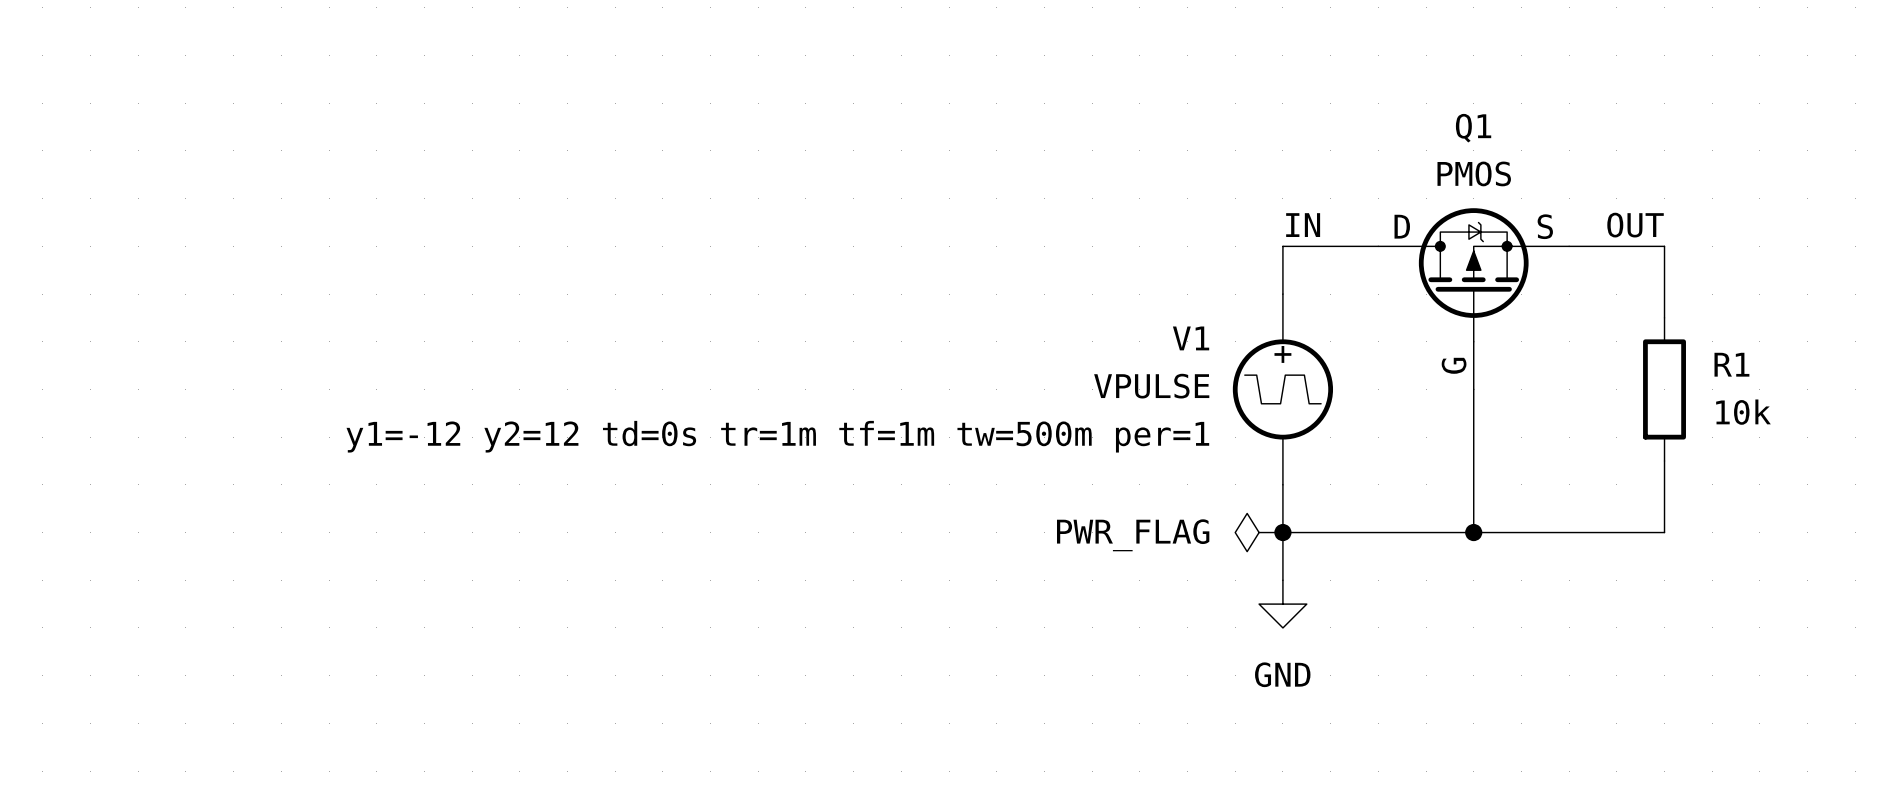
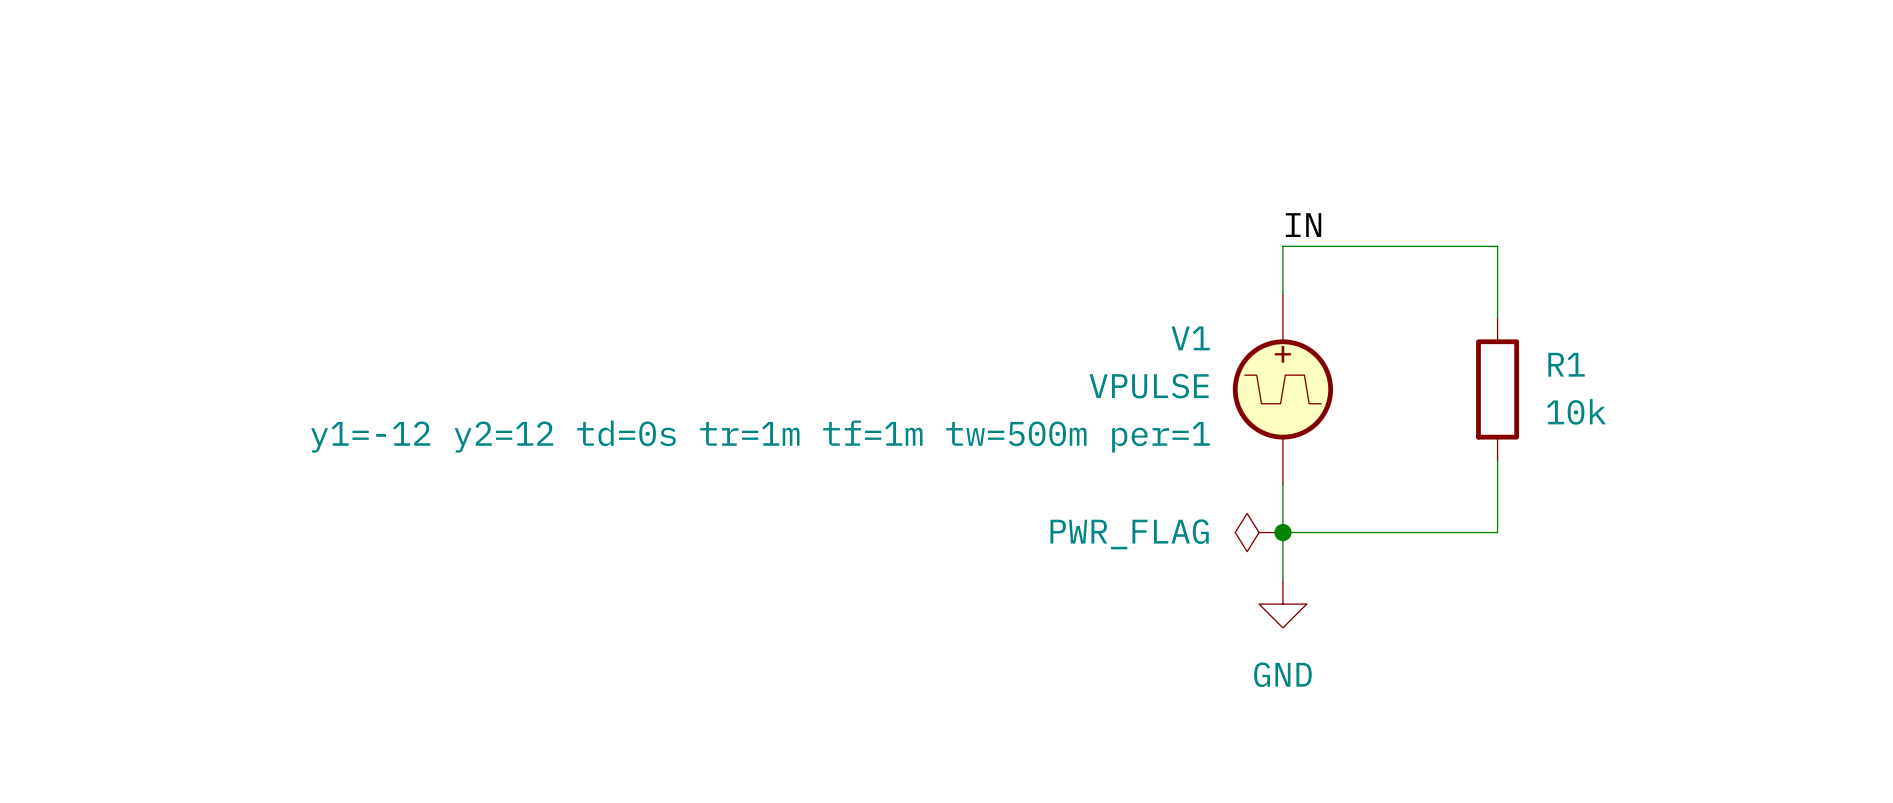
label: OUT (1635, 225) -> none
wire: none -> (1378, 246) (1497, 246) (1497, 317)
wire: (1569, 246) (1664, 246) (1664, 317) -> none
Q1: PMOS (1473, 298) -> none
wire: (1473, 389) (1473, 532) -> none
R1 position: (1664, 389) -> (1497, 389)
wire: (1664, 461) (1664, 532) (1497, 532) -> (1497, 461) (1497, 532)
junction: (1473, 532) -> none

